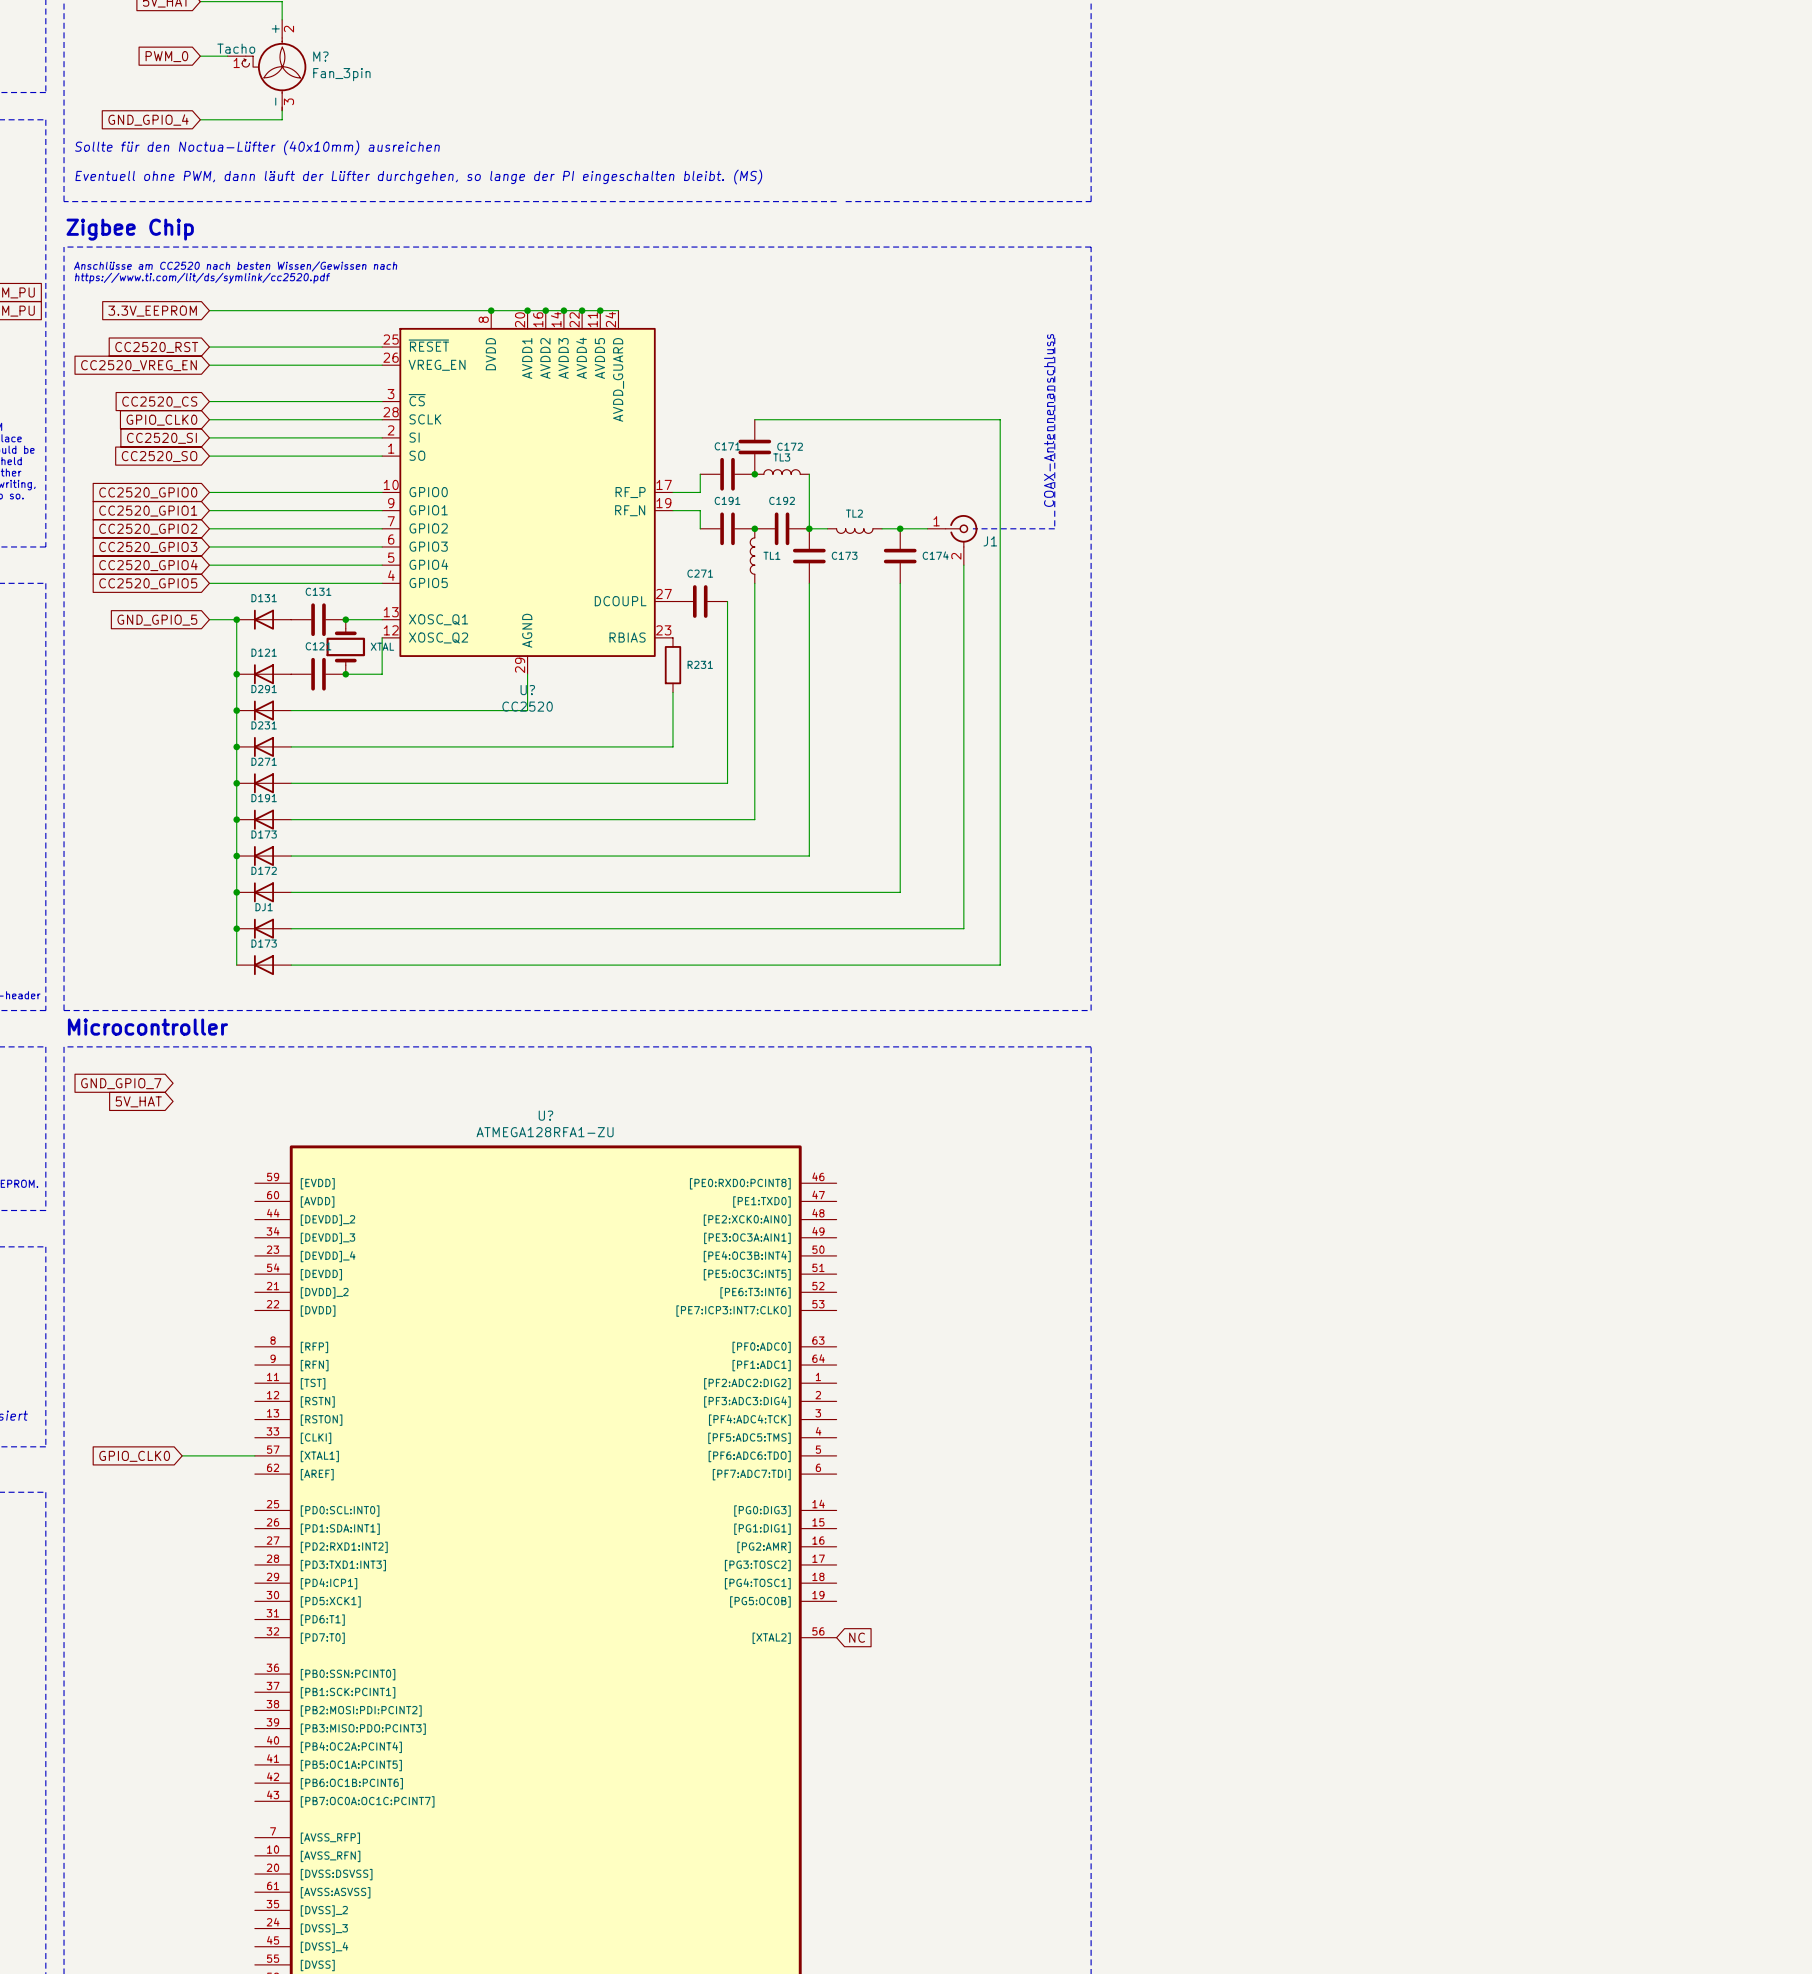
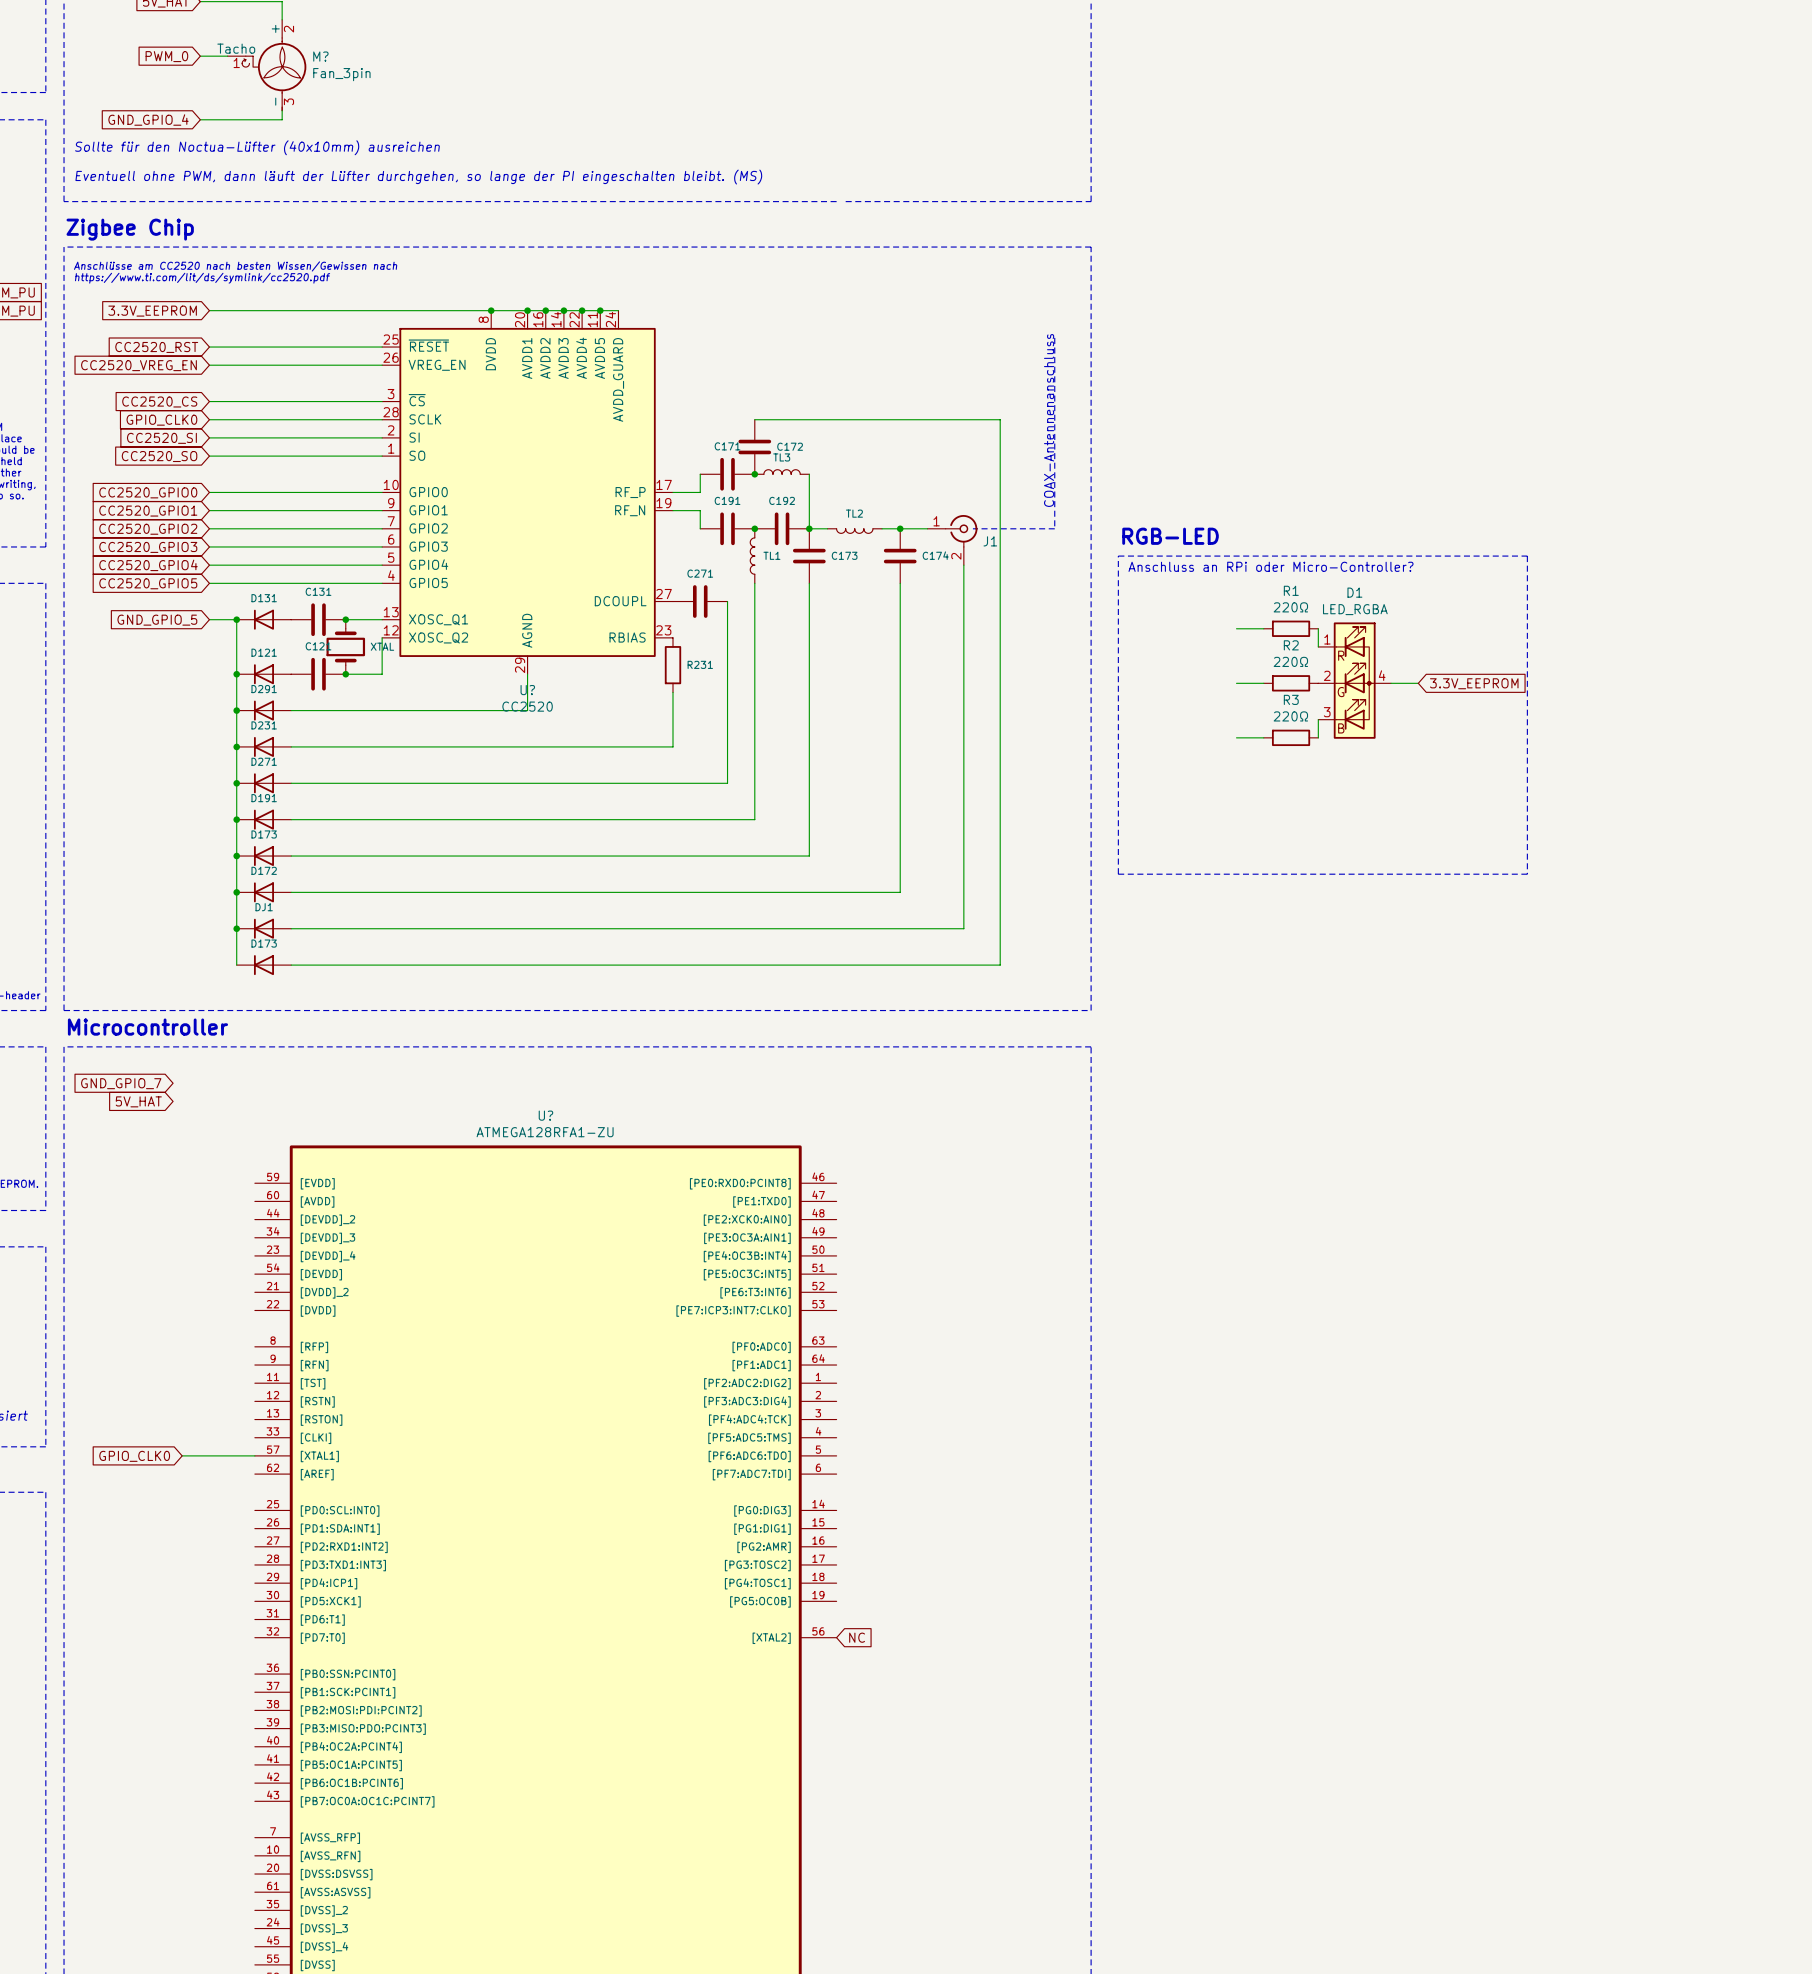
text: none -> RGB-LED (1170, 536)
line: none -> (1118, 556) (1527, 556) (1527, 874) (1118, 874) (1118, 556)
text: none -> Anschluss an RPi oder Micro-Controller? (1271, 566)
wire: none -> (1236, 628) (1263, 628)
R1: none -> 220Ω (1291, 628)
wire: none -> (1318, 628) (1318, 646)
D1: none -> LED_RGBA (1354, 680)
wire: none -> (1236, 683) (1263, 683)
R2: none -> 220Ω (1291, 683)
wire: none -> (1391, 683) (1418, 683)
global label: none -> 3.3V_EEPROM (1474, 683)
wire: none -> (1318, 719) (1318, 737)
wire: none -> (1236, 737) (1263, 737)
R3: none -> 220Ω (1291, 737)

